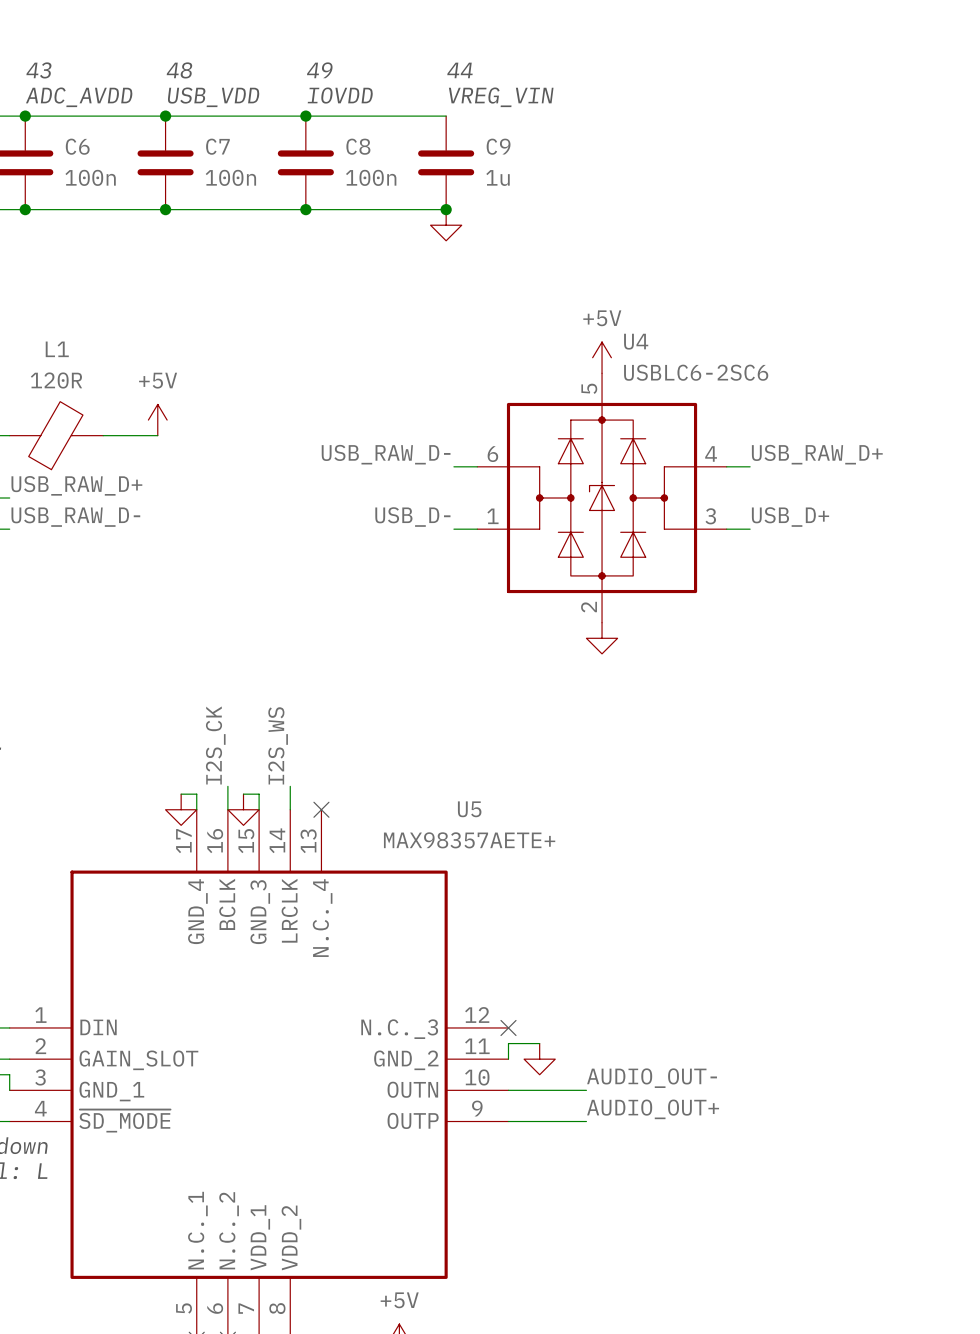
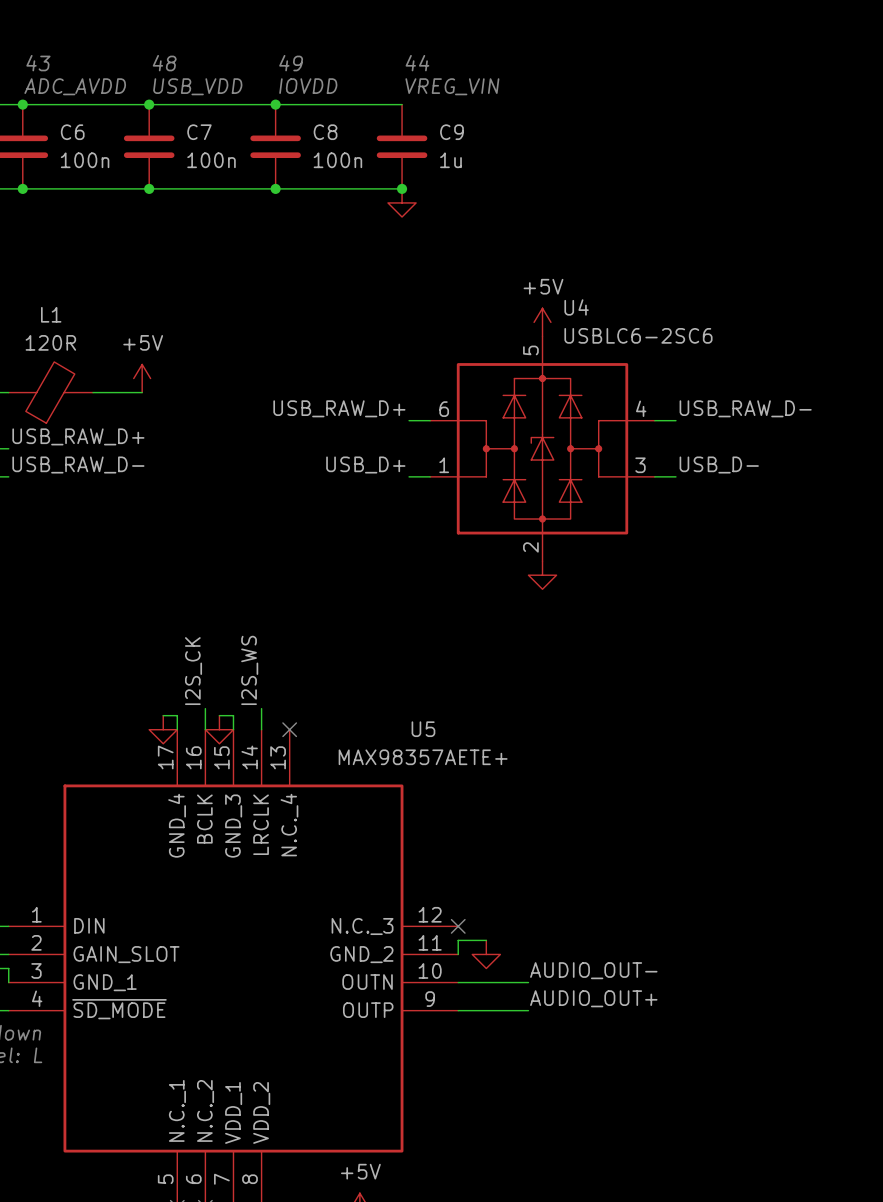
label: USB_RAW_D- (386, 454) -> USB_RAW_D+ (339, 408)
label: USB_RAW_D+ (817, 454) -> USB_RAW_D- (745, 408)
label: USB_D- (412, 517) -> USB_D+ (365, 465)
label: USB_D+ (790, 517) -> USB_D- (719, 465)

